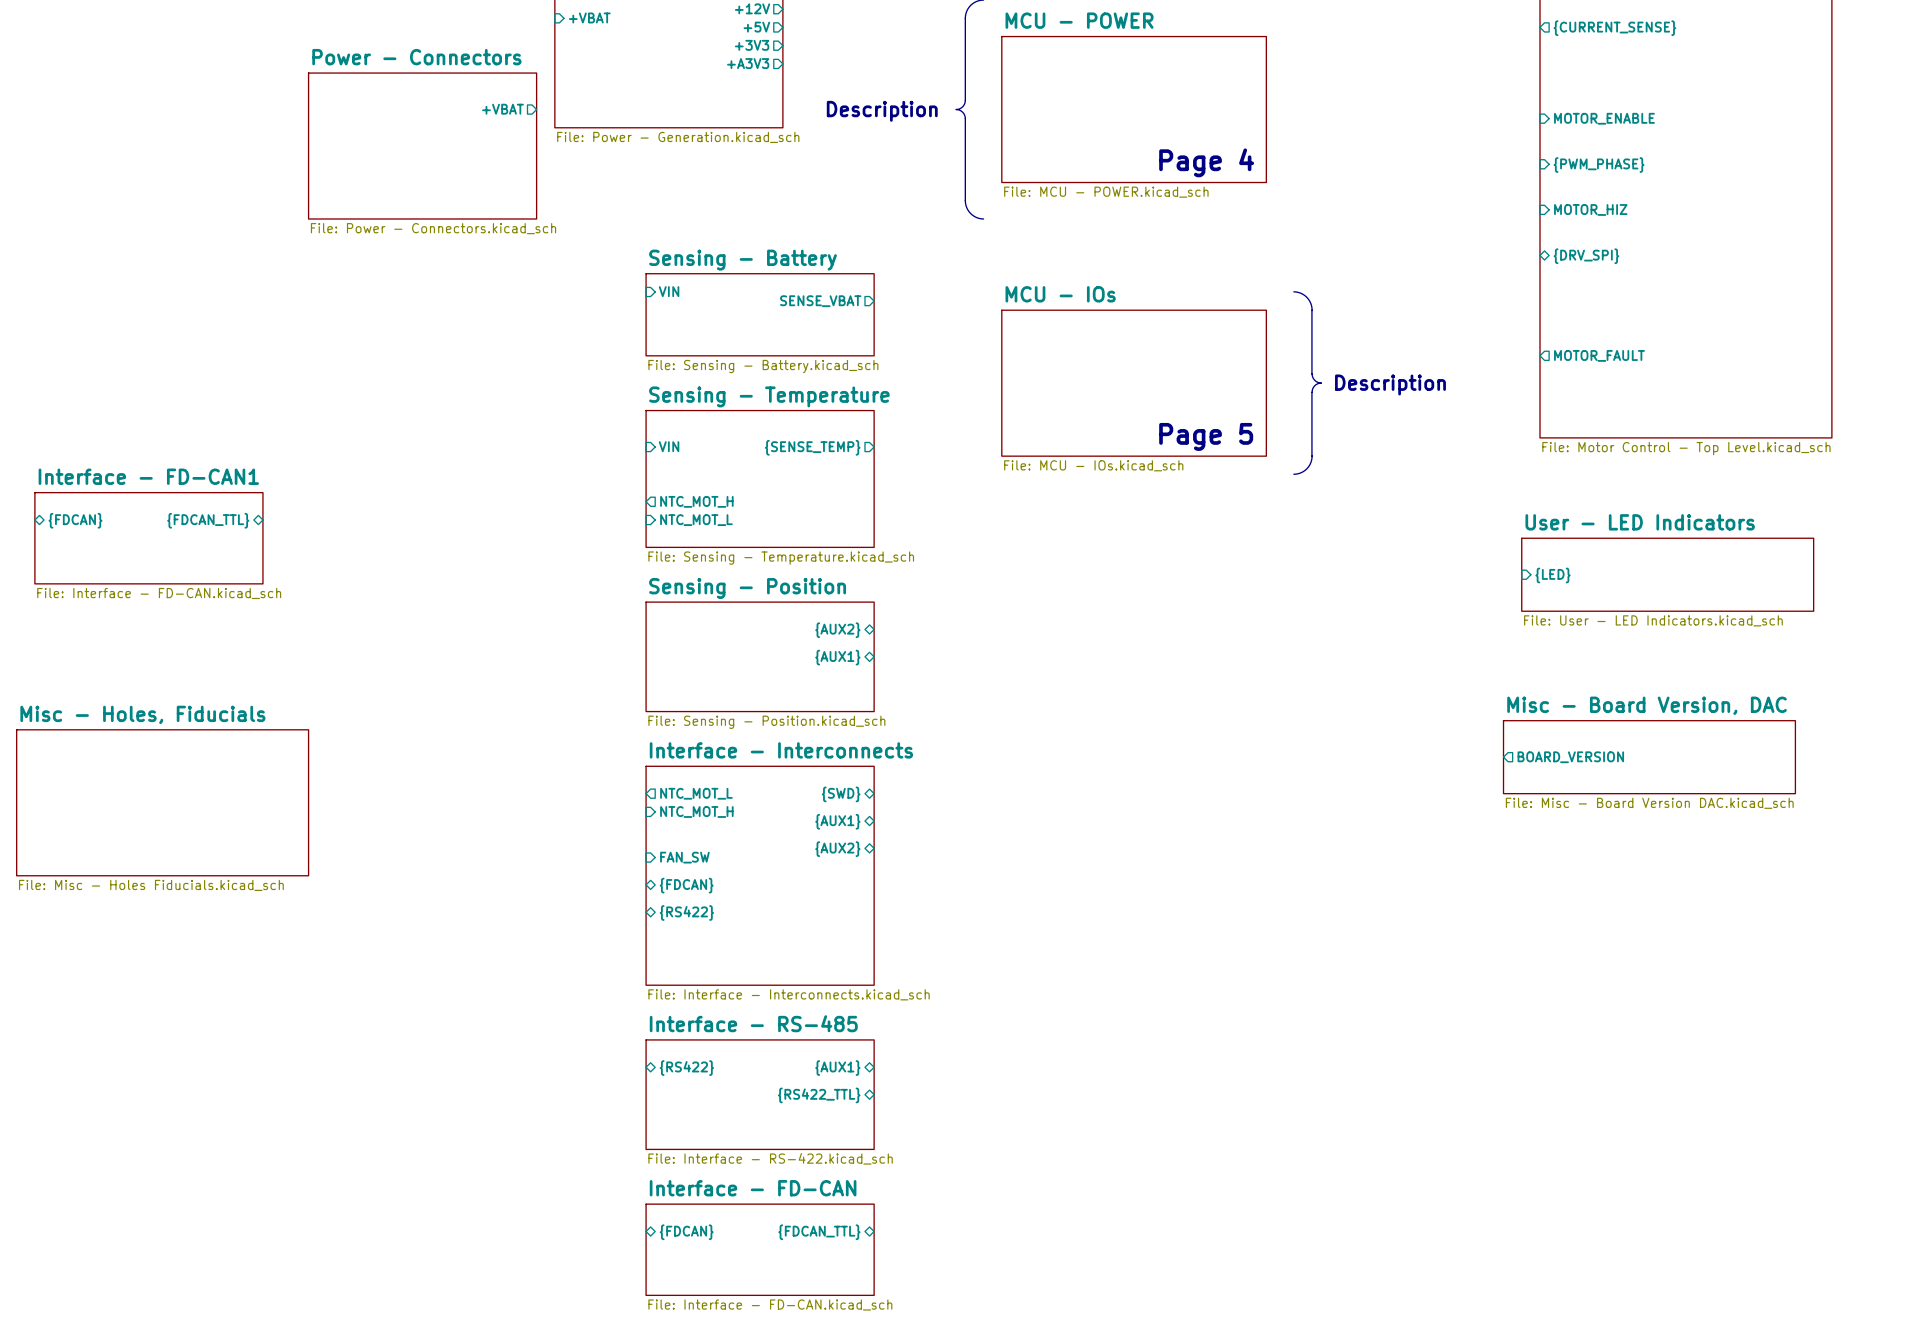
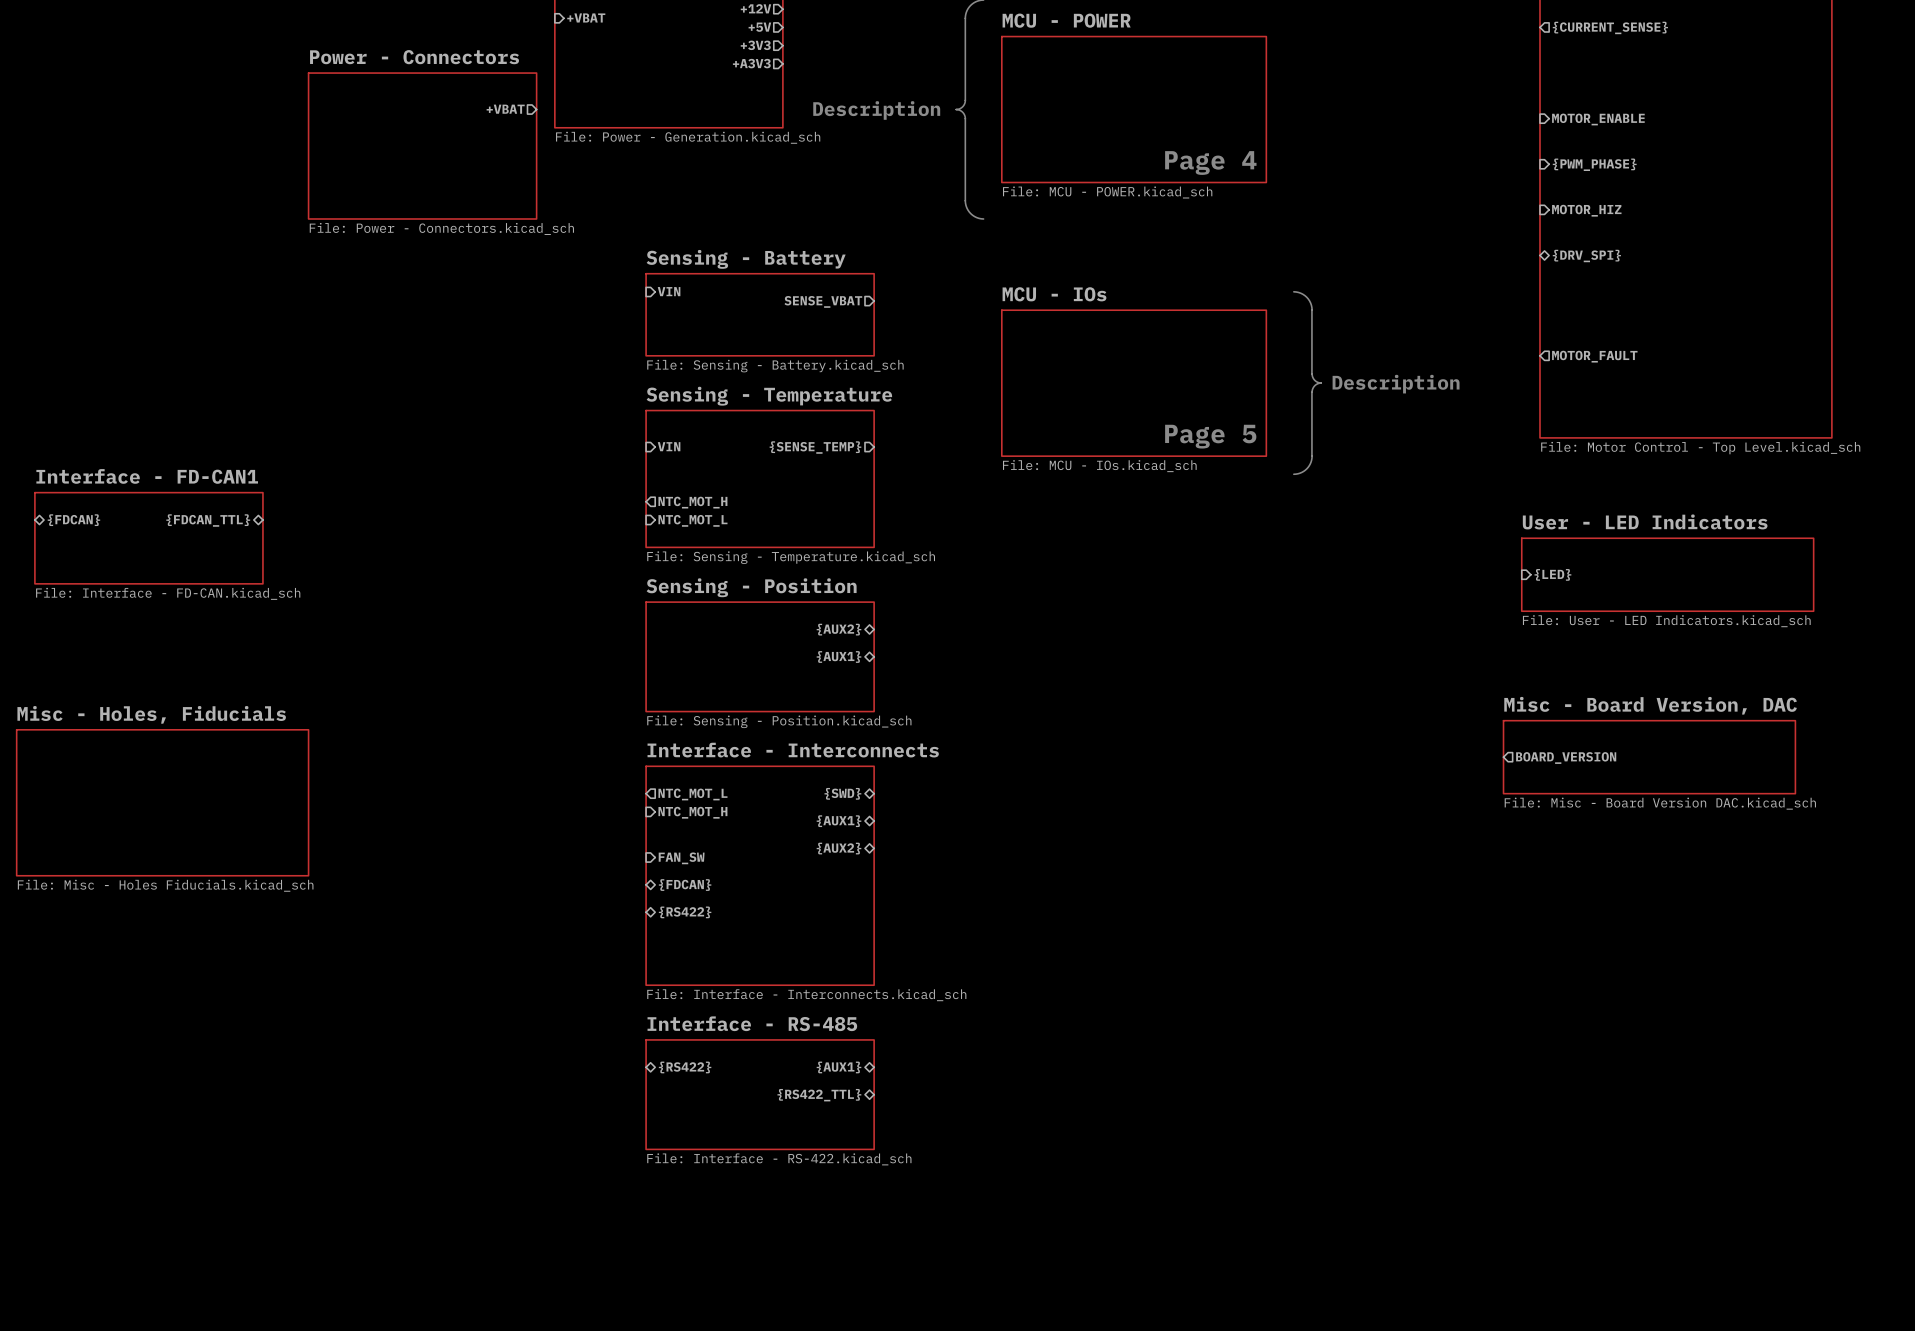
sheet pin: {FDCAN} (686, 1232) -> none
sheet pin: {FDCAN_TTL} (819, 1232) -> none
sheet Interface - FD-CAN: File: Interface - FD-CAN.kicad_sch (760, 1249) -> none

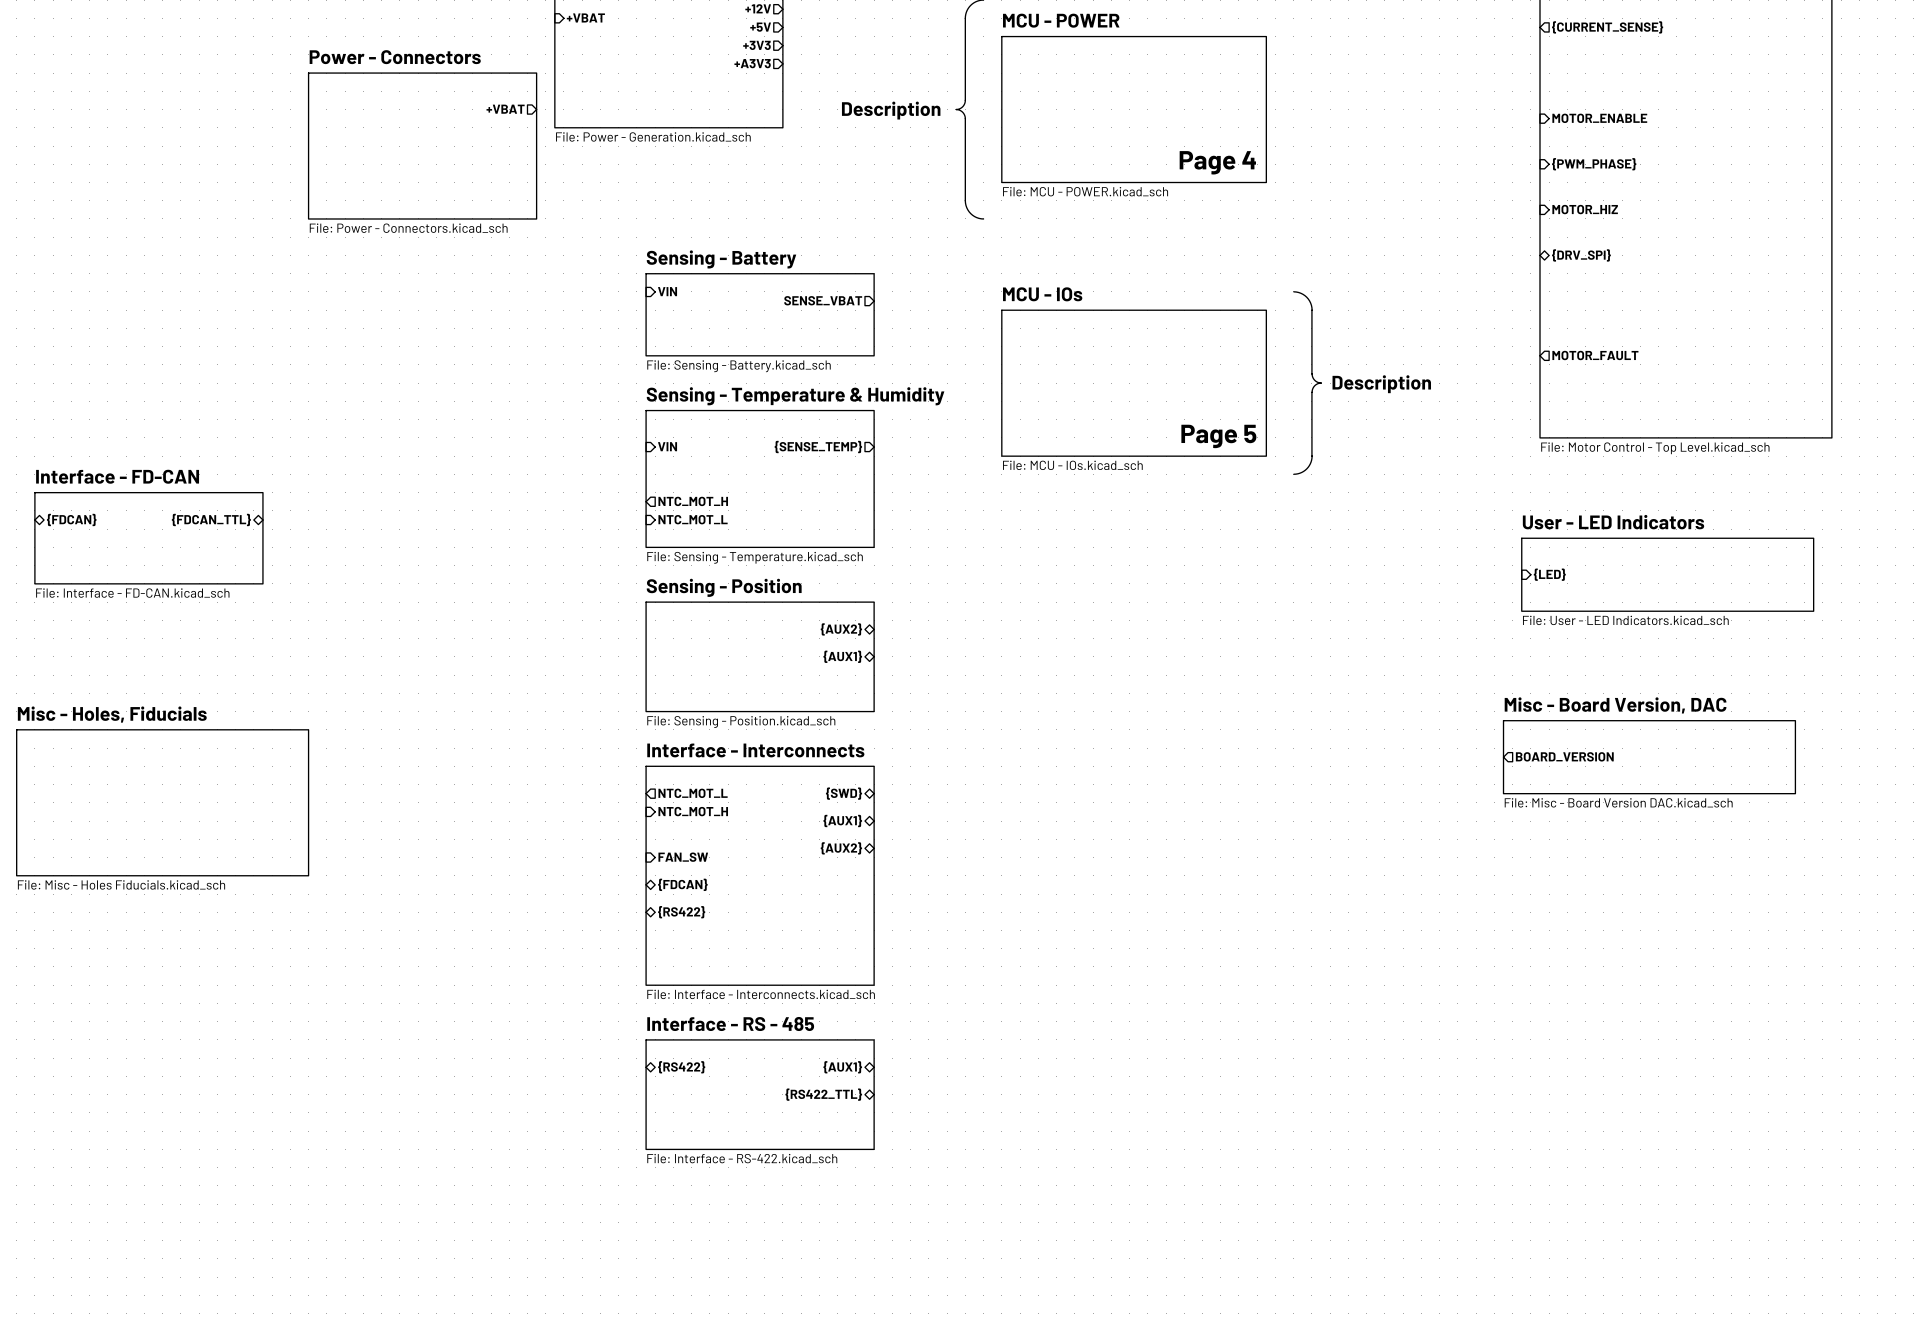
sheet Sensing - Temperature name: Sensing - Temperature (769, 396) -> Sensing - Temperature & Humidity (795, 396)
sheet Interface - FD-CAN1 name: Interface - FD-CAN1 (147, 476) -> Interface - FD-CAN (117, 476)
sheet Interface - RS-485 name: Interface - RS-485 (752, 1023) -> Interface - RS - 485 (730, 1023)

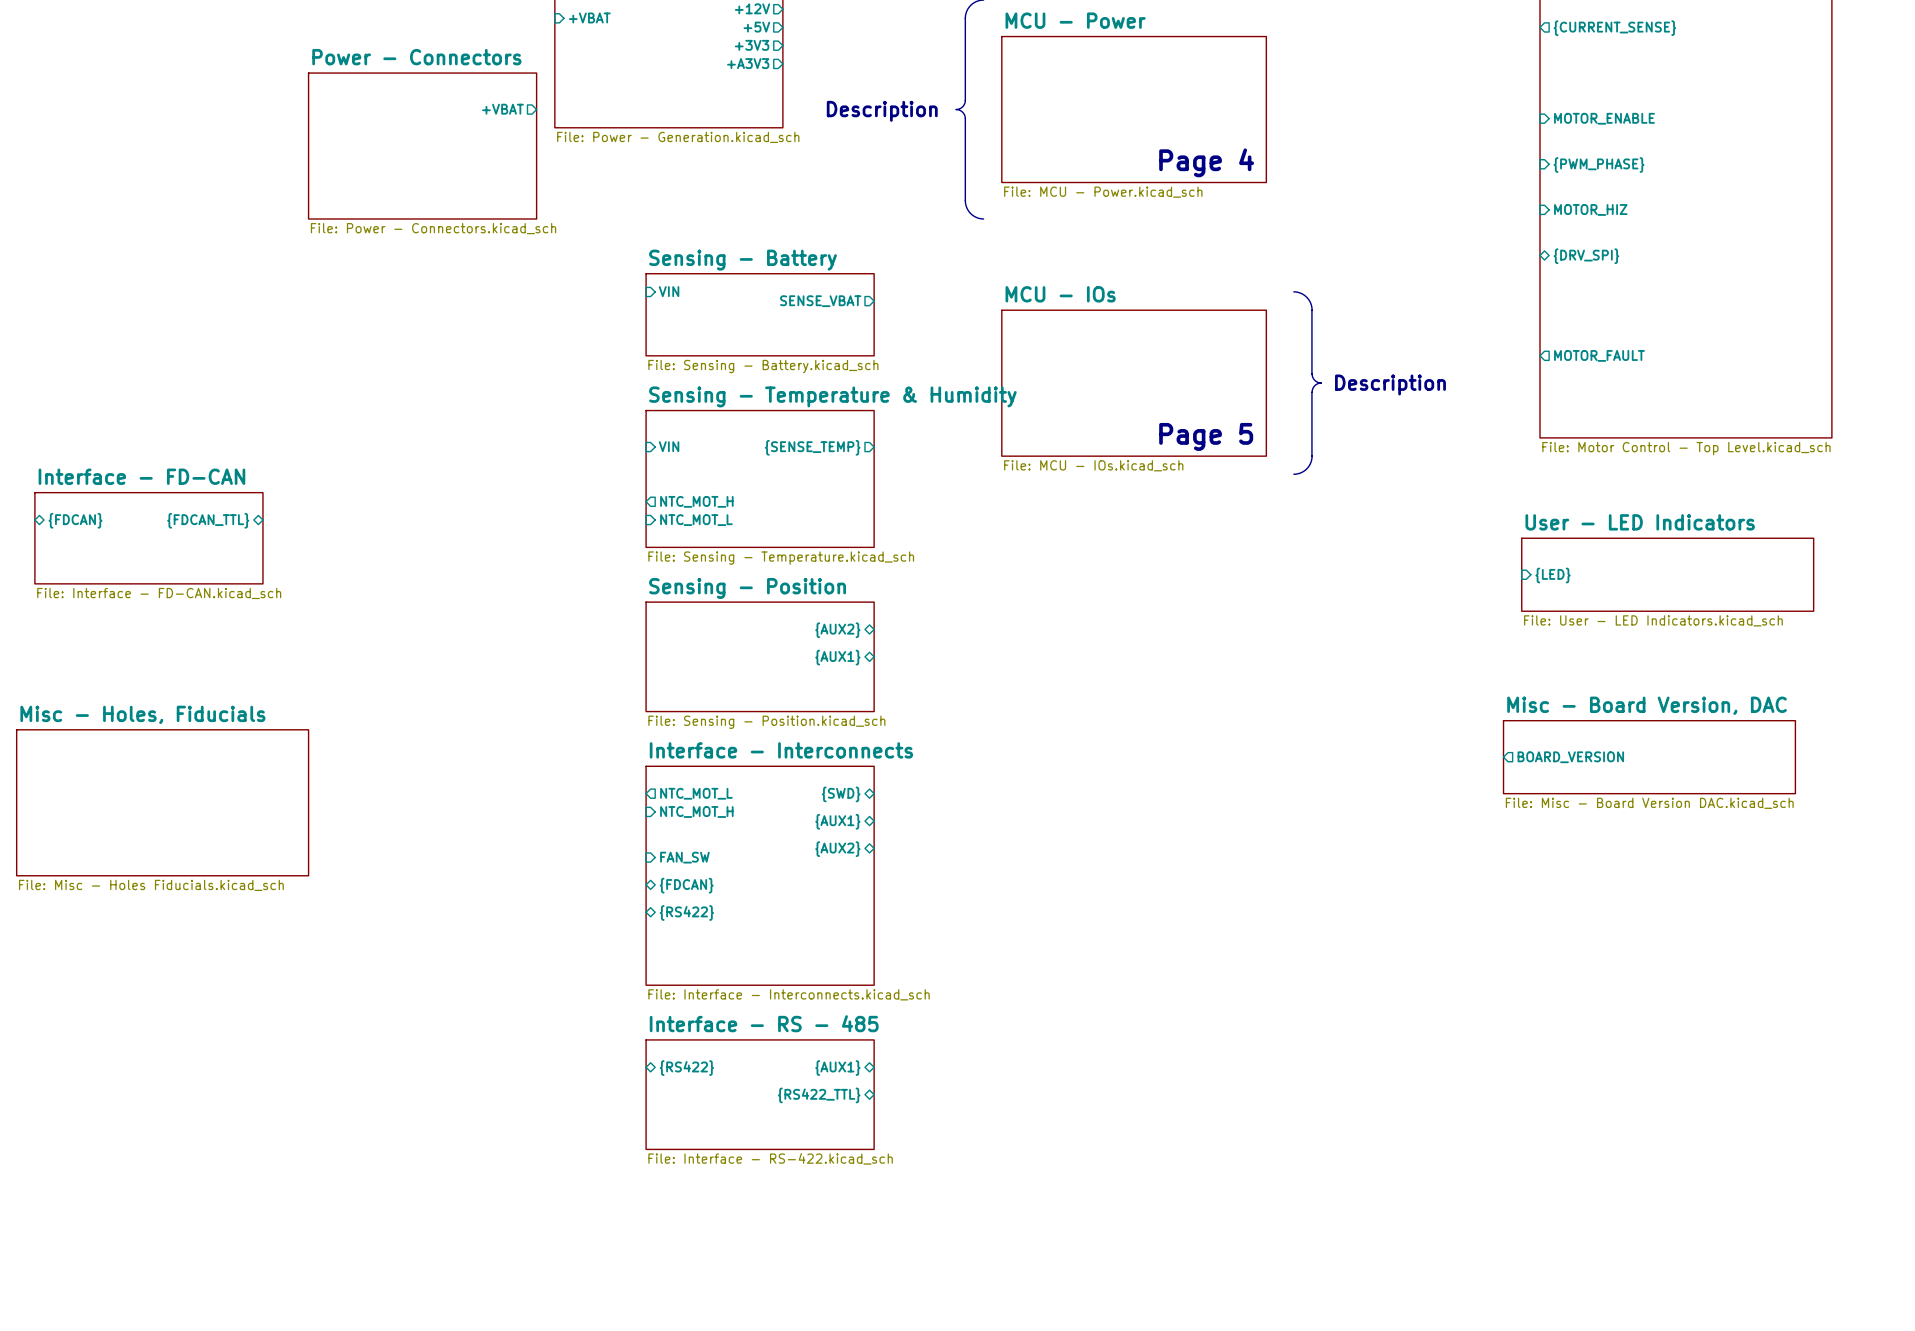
sheet MCU - POWER name: MCU - POWER (1061, 20) -> MCU - Power (1075, 20)
sheet MCU - POWER value: File: MCU - POWER.kicad_sch (1085, 191) -> File: MCU - Power.kicad_sch (1103, 192)

